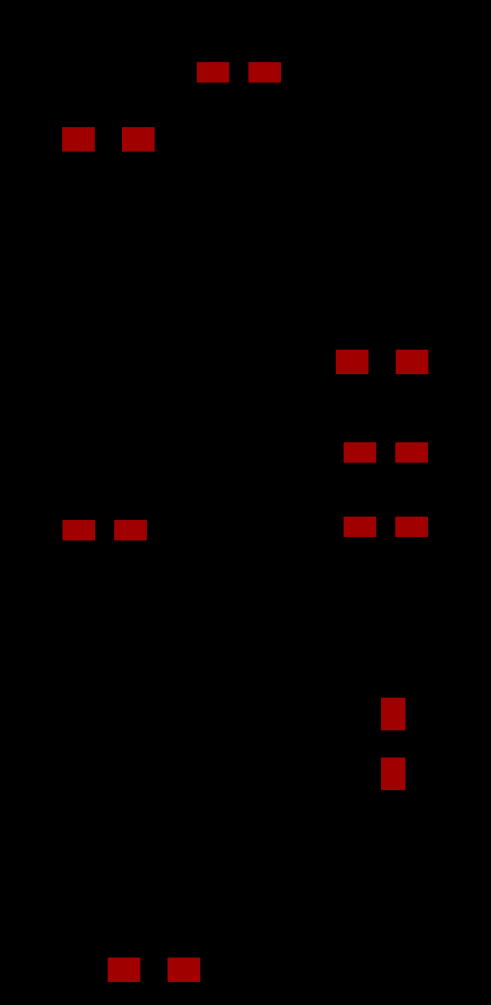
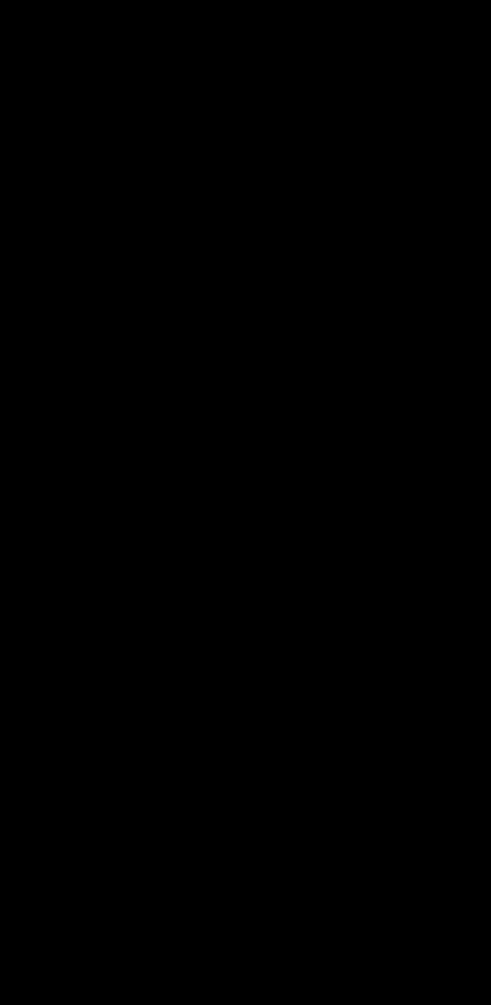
part: (238, 72) -> none
part: (108, 139) -> none
part: (382, 361) -> none
part: (385, 452) -> none
part: (385, 526) -> none
part: (104, 530) -> none
part: (393, 743) -> none
part: (153, 969) -> none

